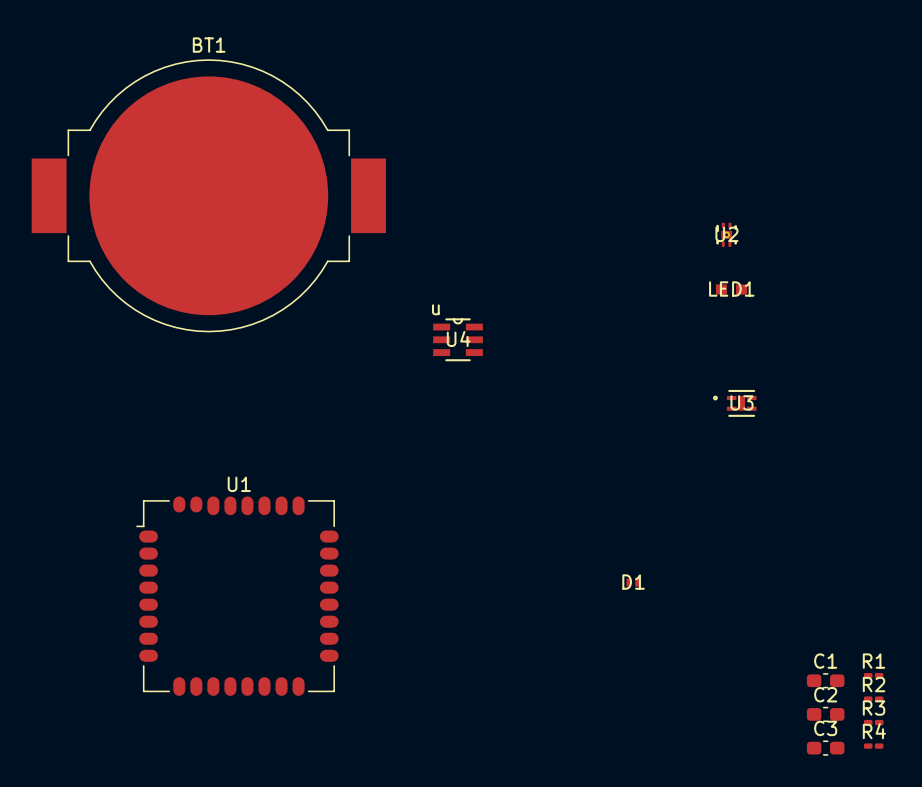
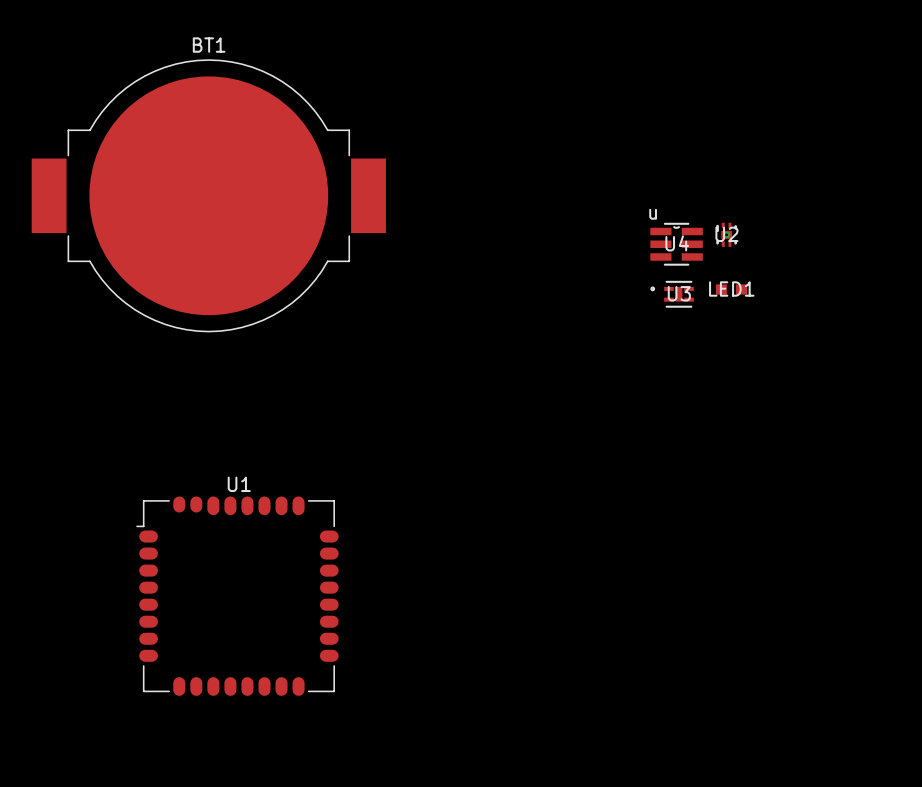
U4 footprint: [433, 318, 483, 362] -> [650, 222, 703, 266]
U3 position: (734, 403) -> (672, 294)
D1: (633, 582) -> none
R1: (873, 675) -> none
C1: (825, 680) -> none
R2: (873, 699) -> none
C2: (825, 714) -> none
R3: (873, 722) -> none
R4: (873, 746) -> none
C3: (825, 748) -> none

